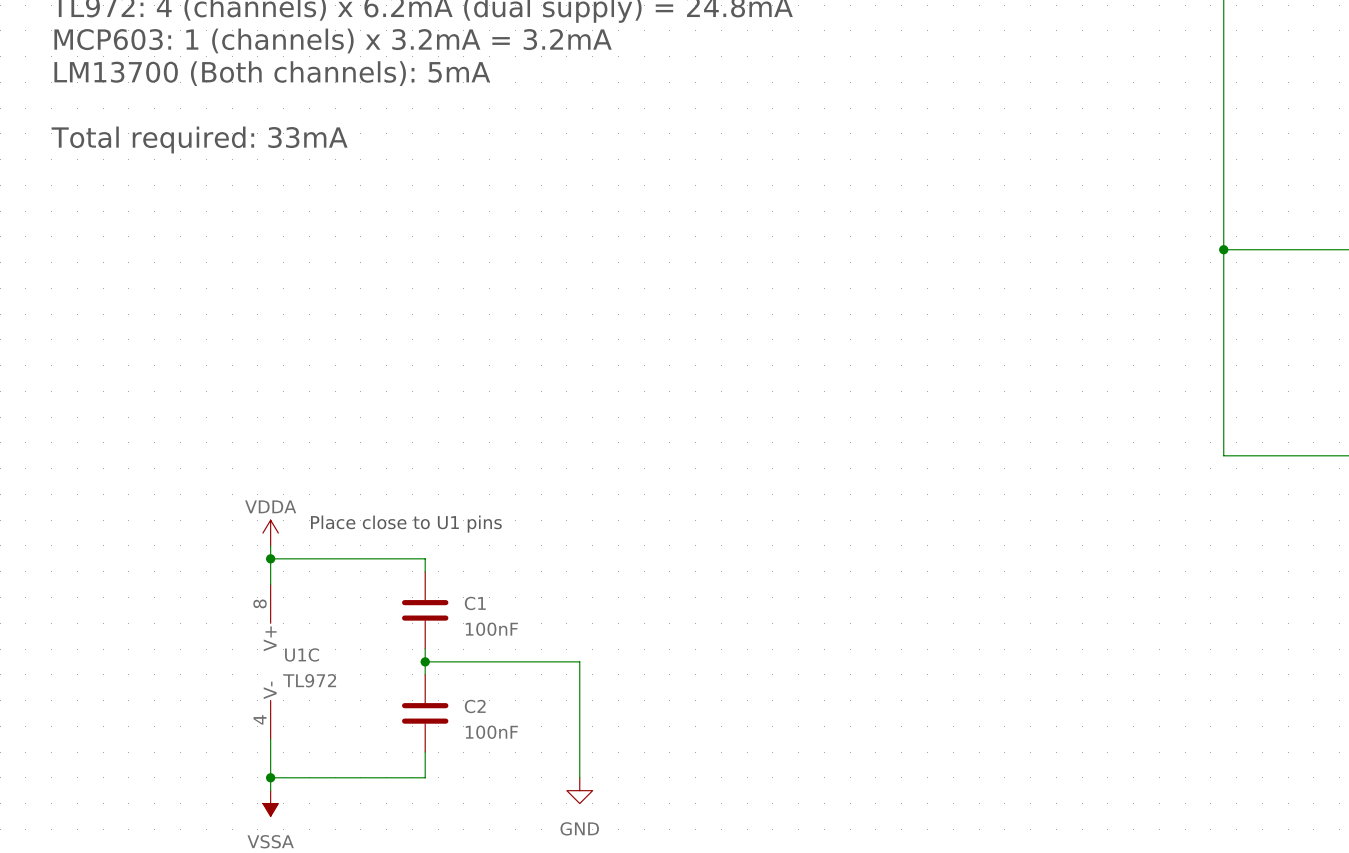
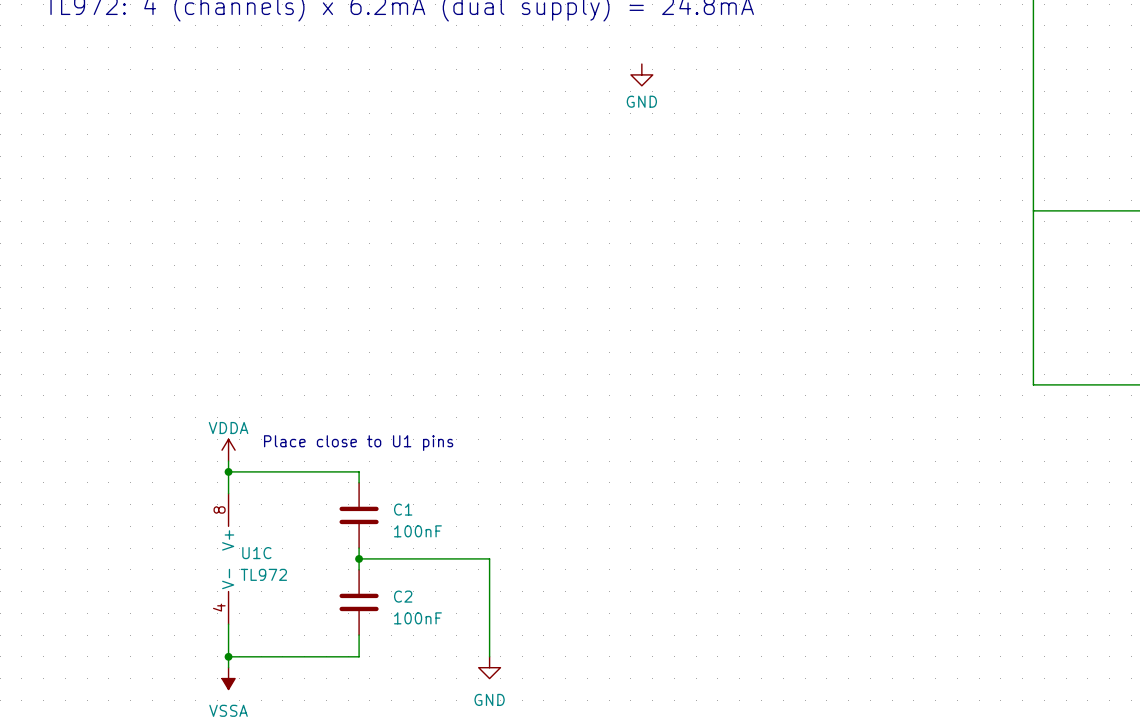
text: MCP603: 1 (channels) x 3.2mA = 3.2mA (333, 40) -> none
text: LM13700 (Both channels): 5mA (272, 73) -> none
power symbol: none -> GND (641, 74)
text: Total required: 33mA (199, 139) -> none
junction: (1223, 249) -> none

